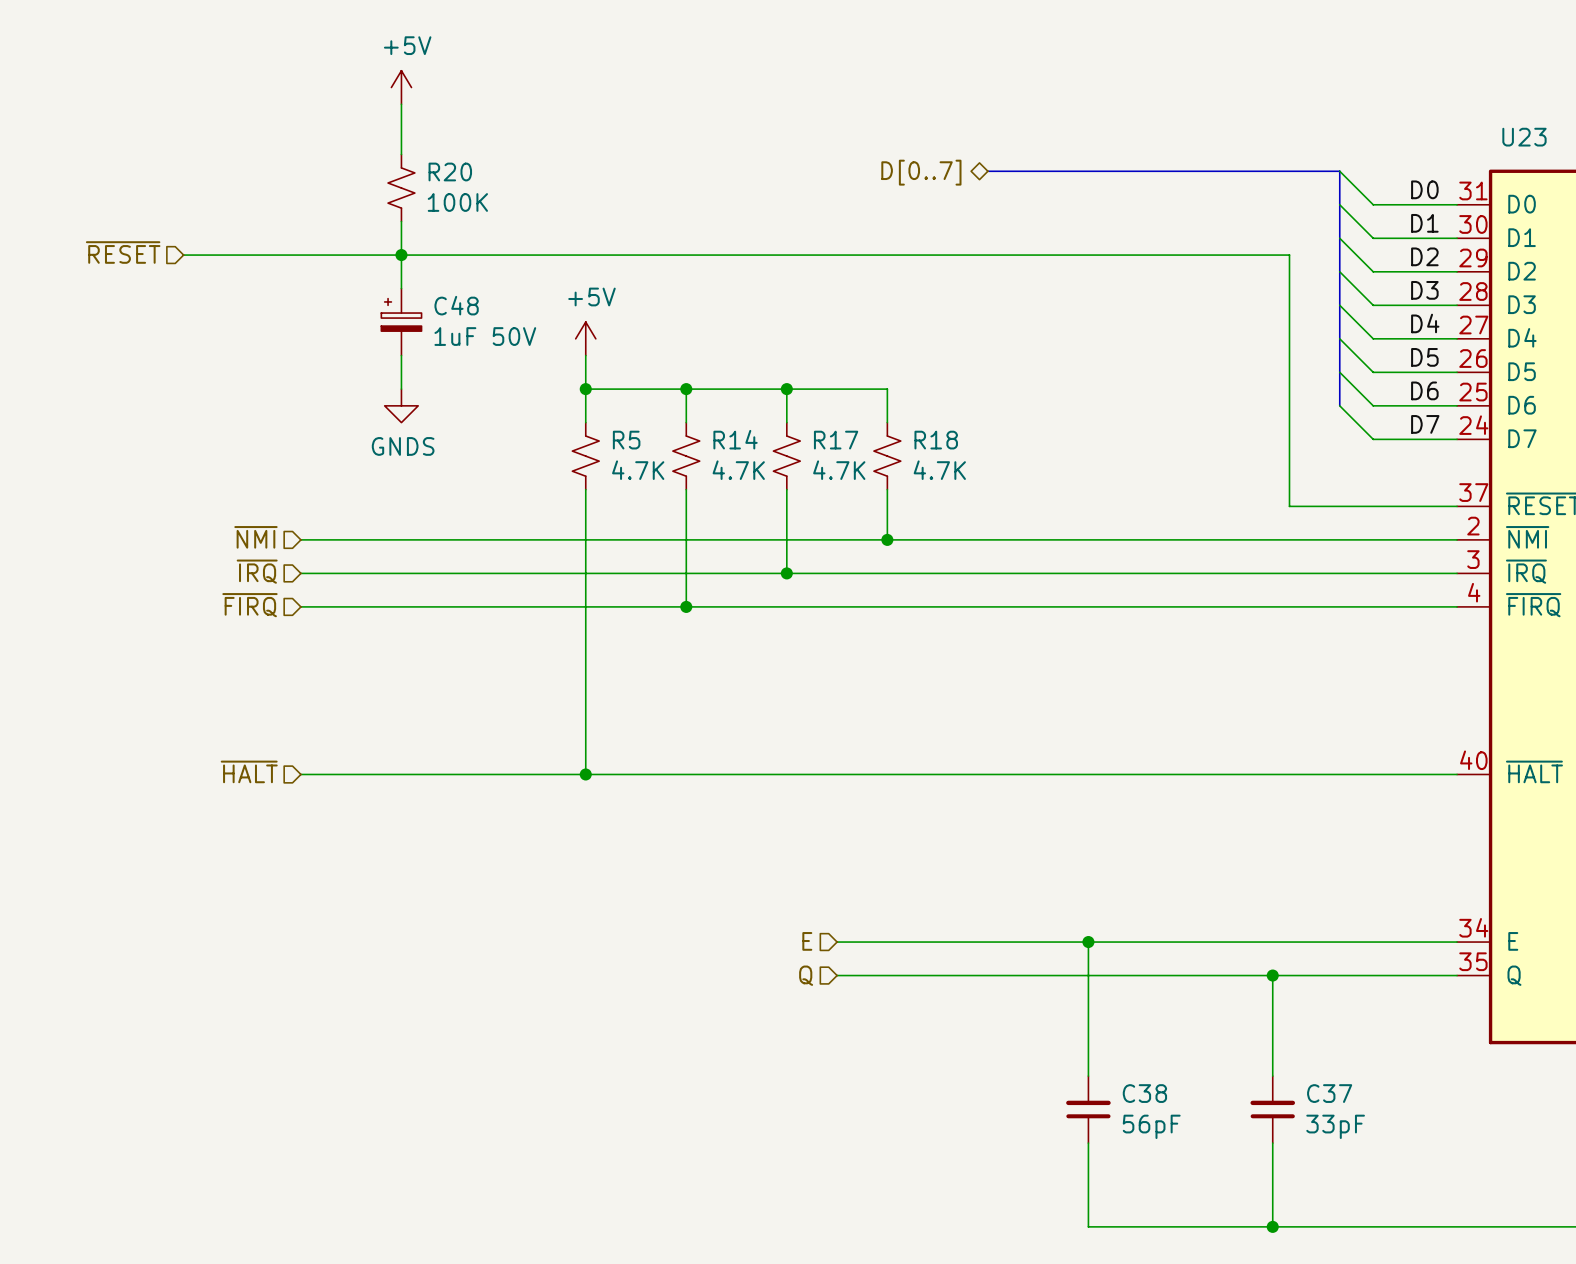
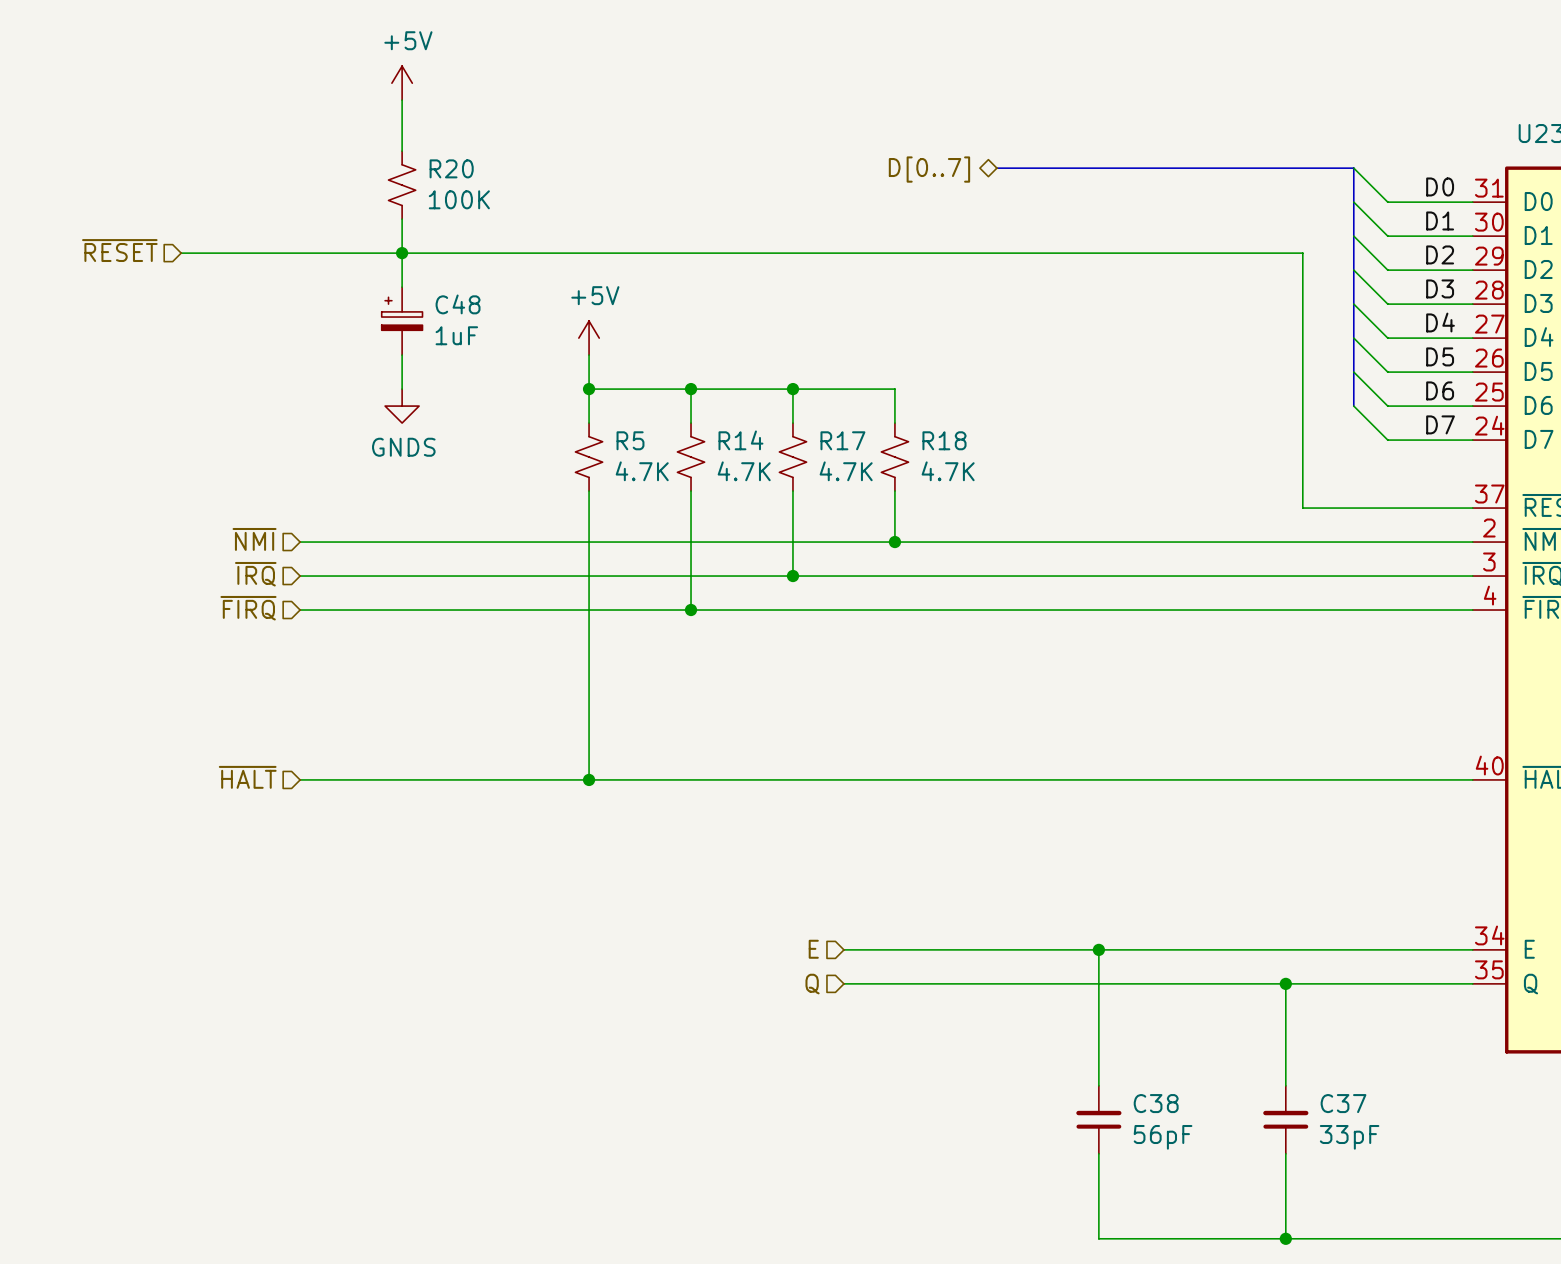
C48 value: 1uF 50V (485, 336) -> 1uF (456, 335)

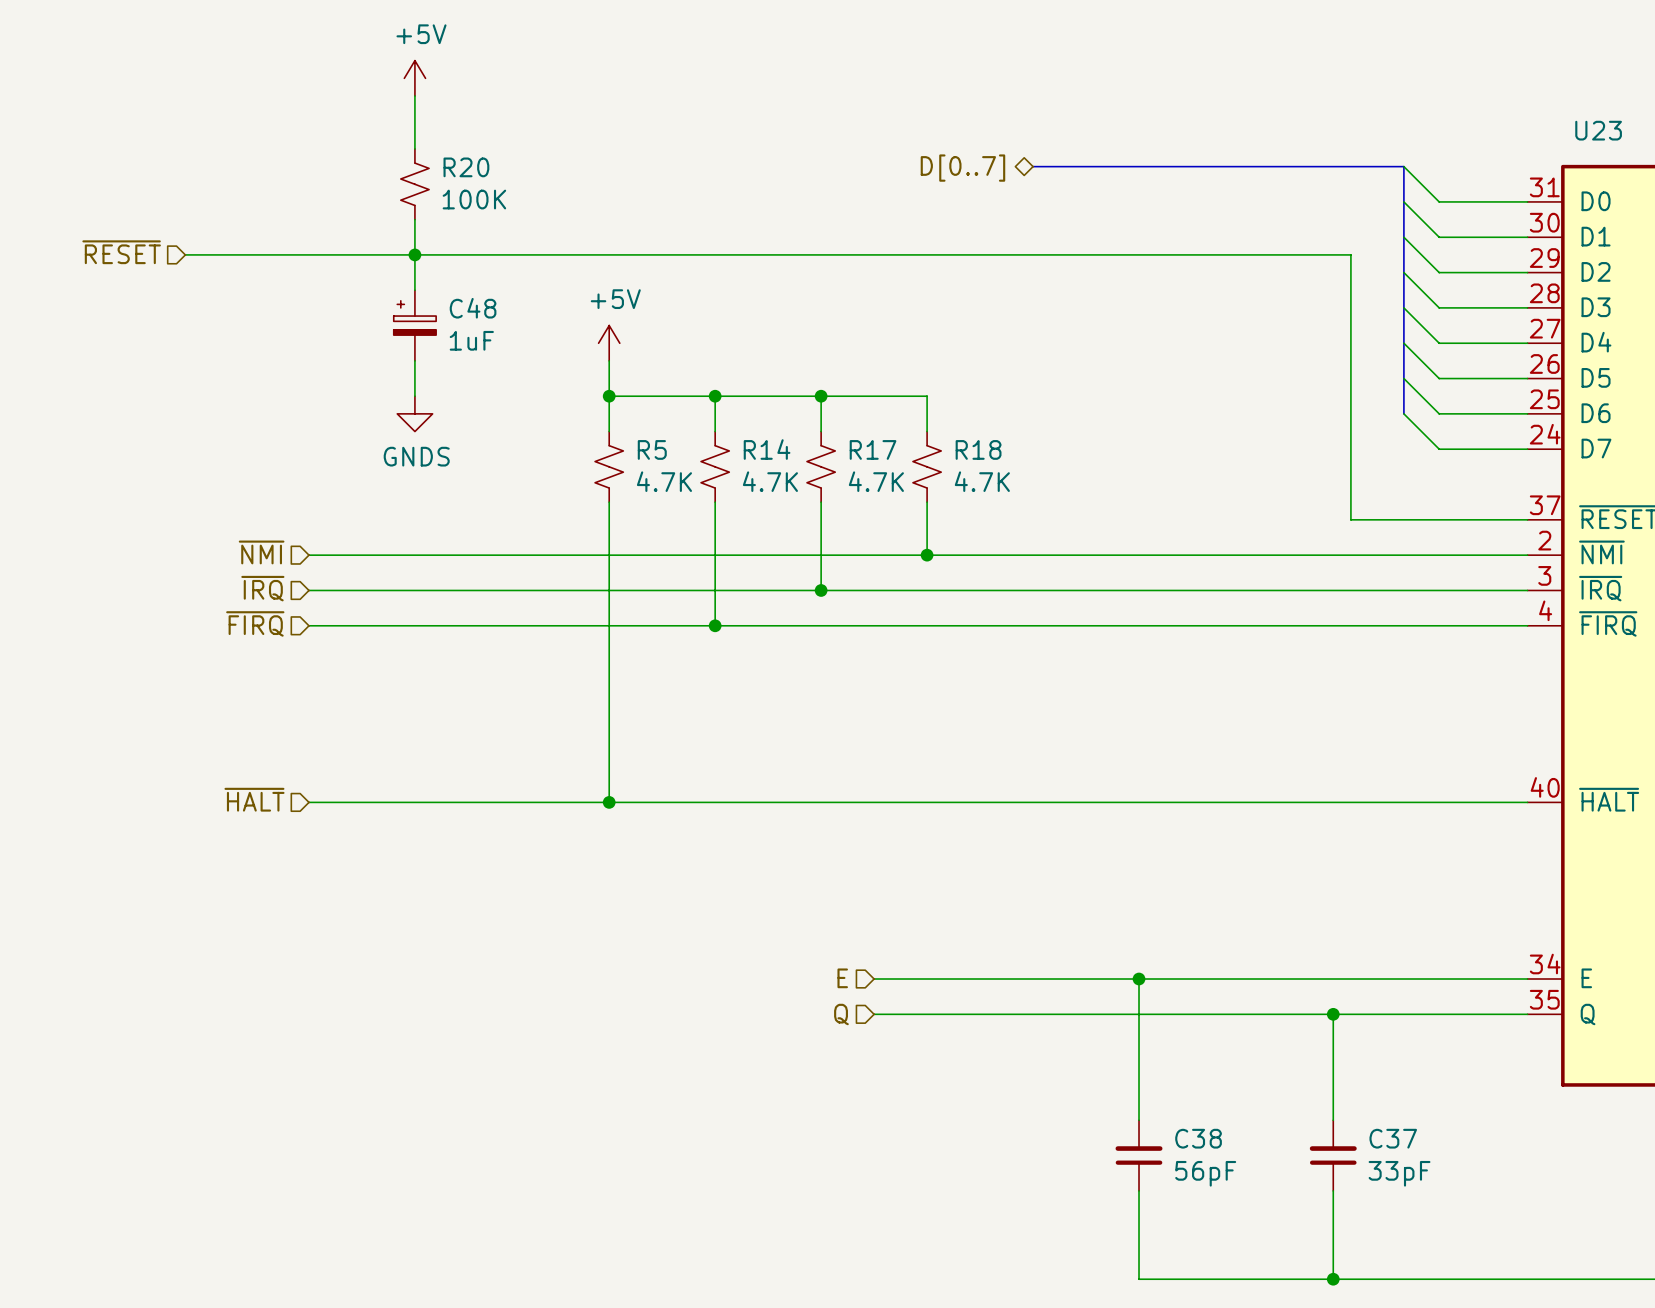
label: D0 (1440, 186) -> none
label: D1 (1440, 220) -> none
label: D2 (1440, 254) -> none
label: D3 (1440, 288) -> none
label: D4 (1440, 322) -> none
label: D5 (1440, 356) -> none
label: D6 (1440, 390) -> none
label: D7 (1440, 424) -> none

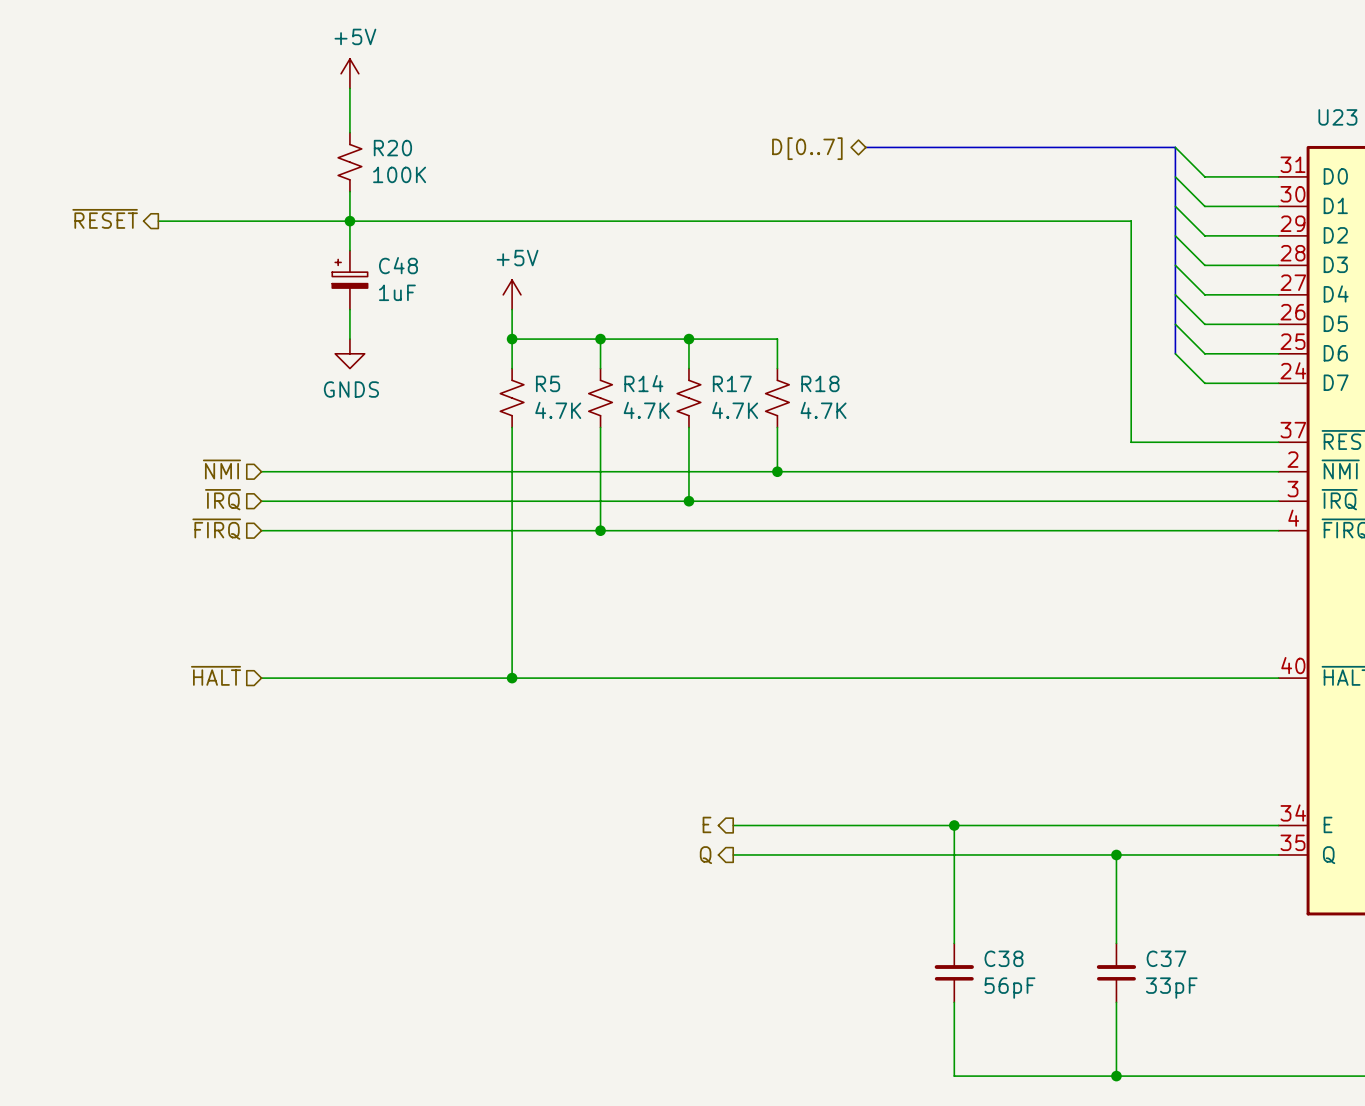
hierarchical label shape: input (121, 252) -> output (105, 218)
hierarchical label shape: input (842, 978) -> output (707, 824)
hierarchical label shape: input (841, 1014) -> output (705, 855)

